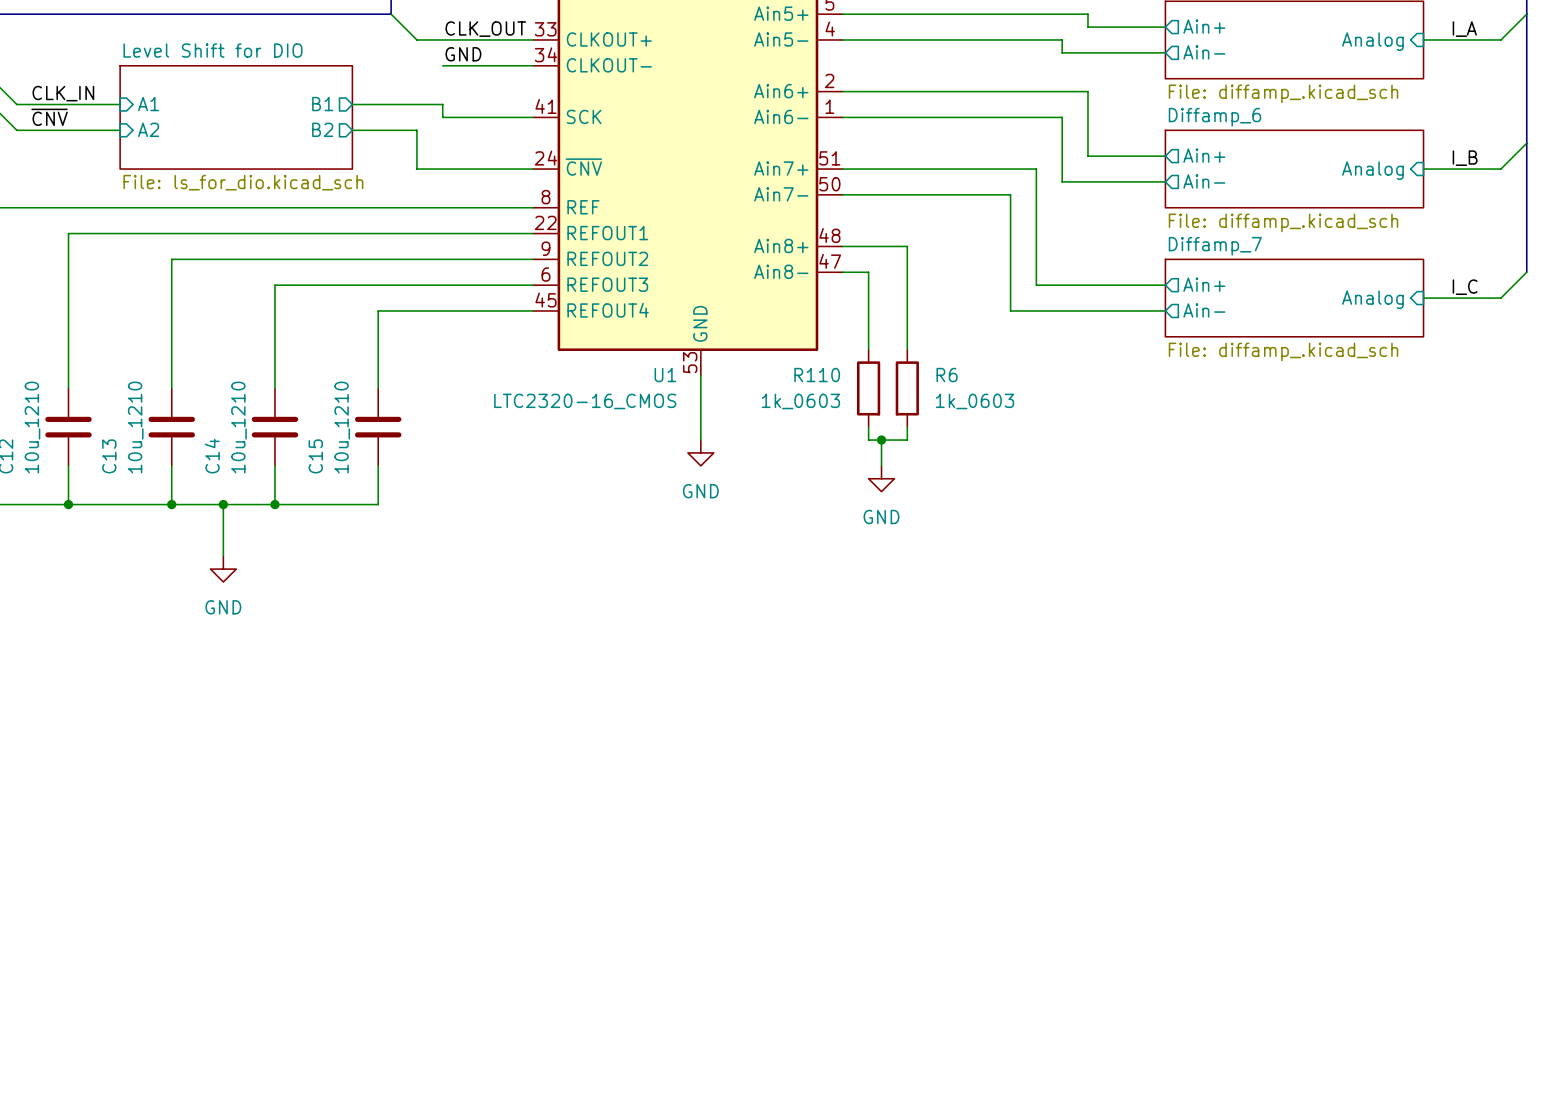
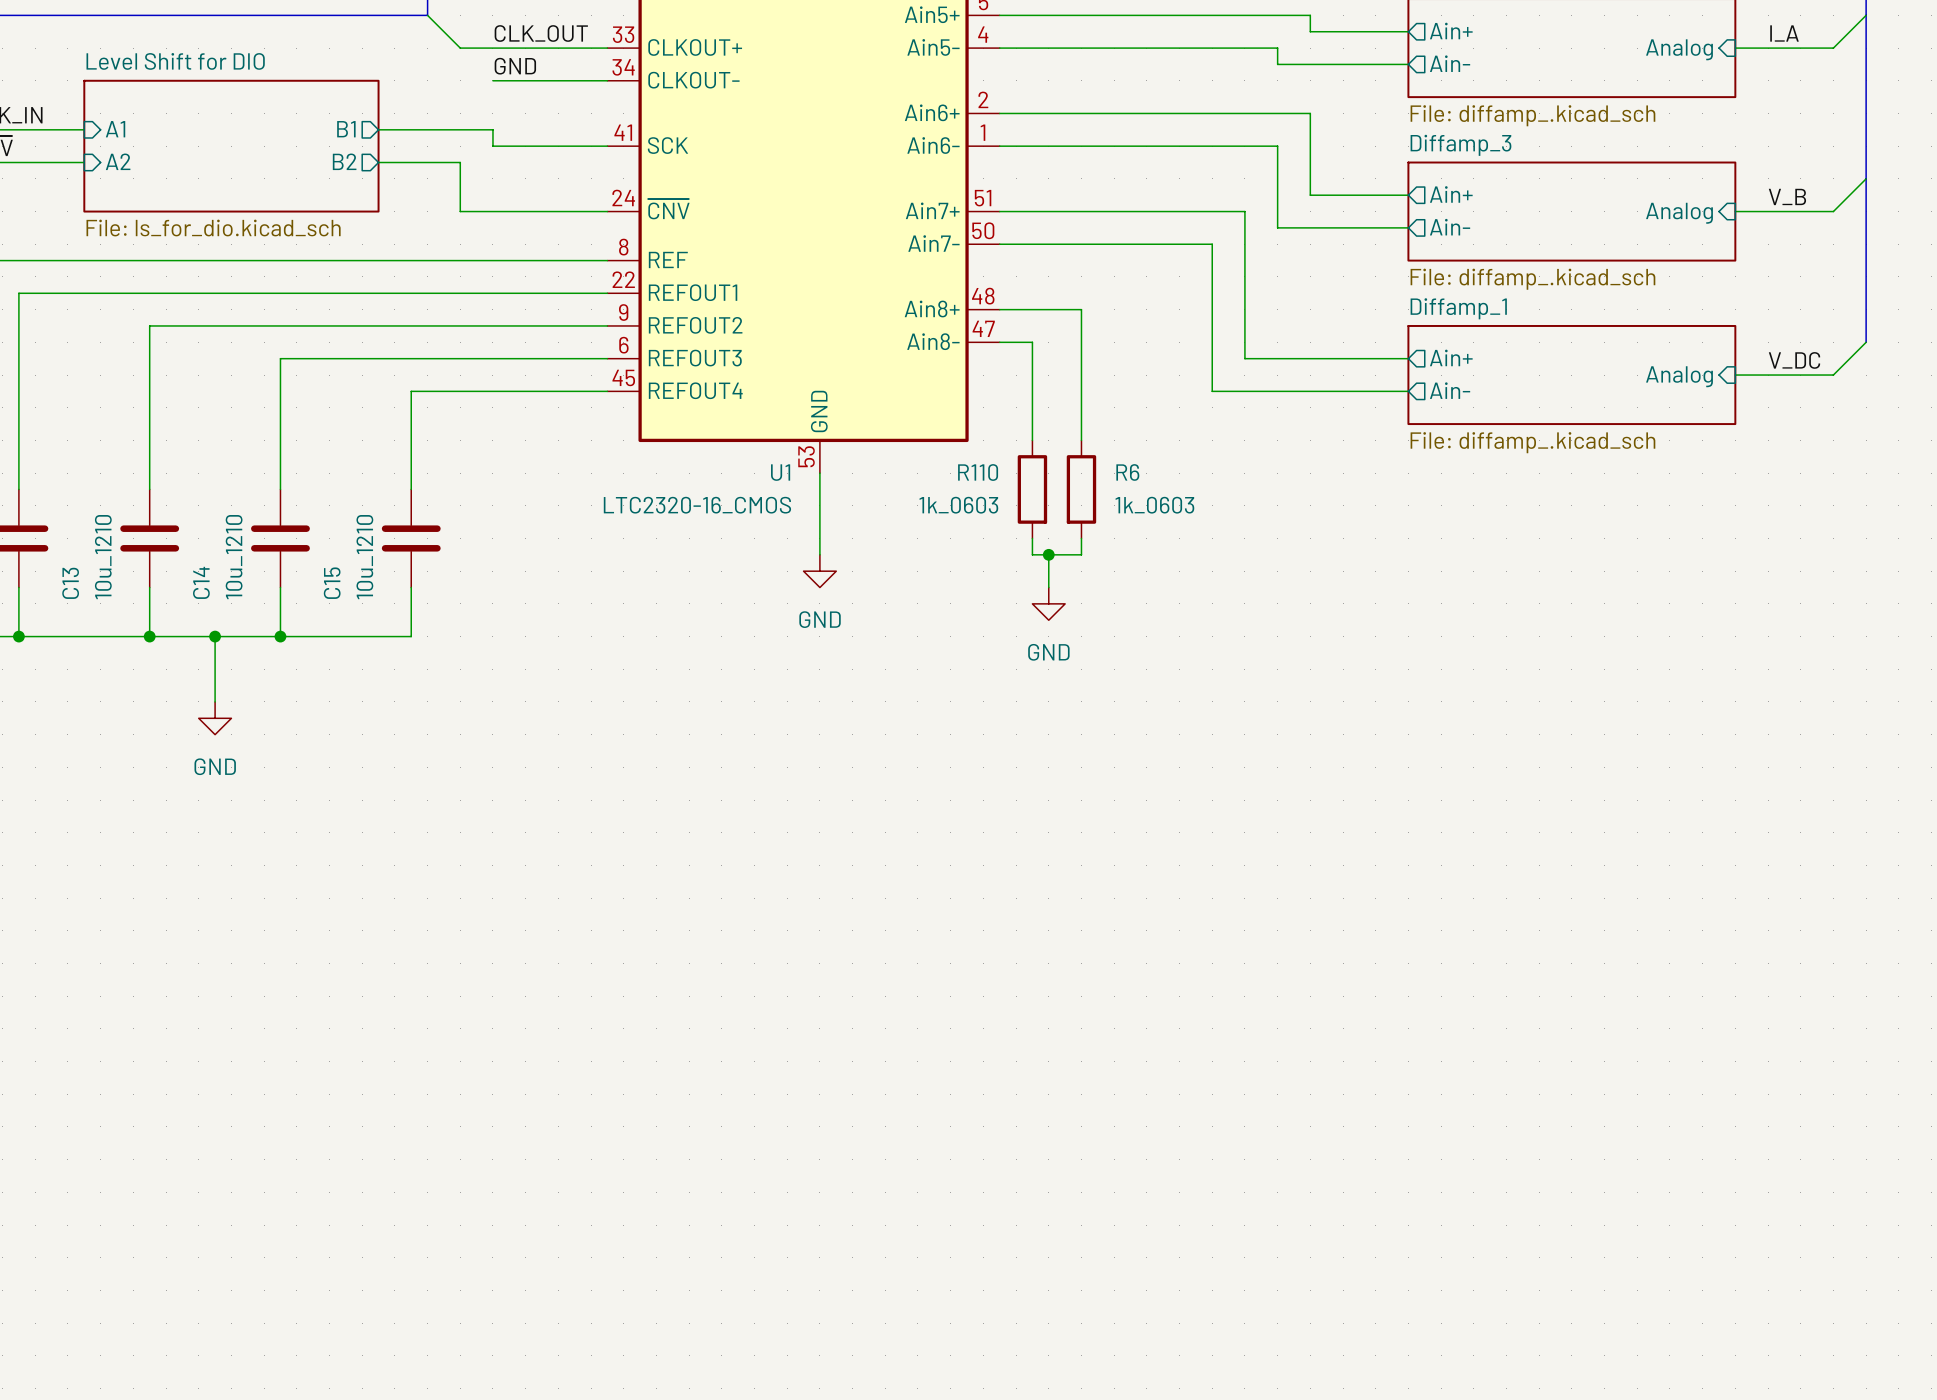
sheet Diffamp_6 name: Diffamp_6 (1214, 117) -> Diffamp_3 (1460, 145)
label: I_B (1465, 158) -> V_B (1787, 196)
sheet Diffamp_7 name: Diffamp_7 (1215, 246) -> Diffamp_1 (1458, 308)
label: I_C (1465, 287) -> V_DC (1794, 360)

